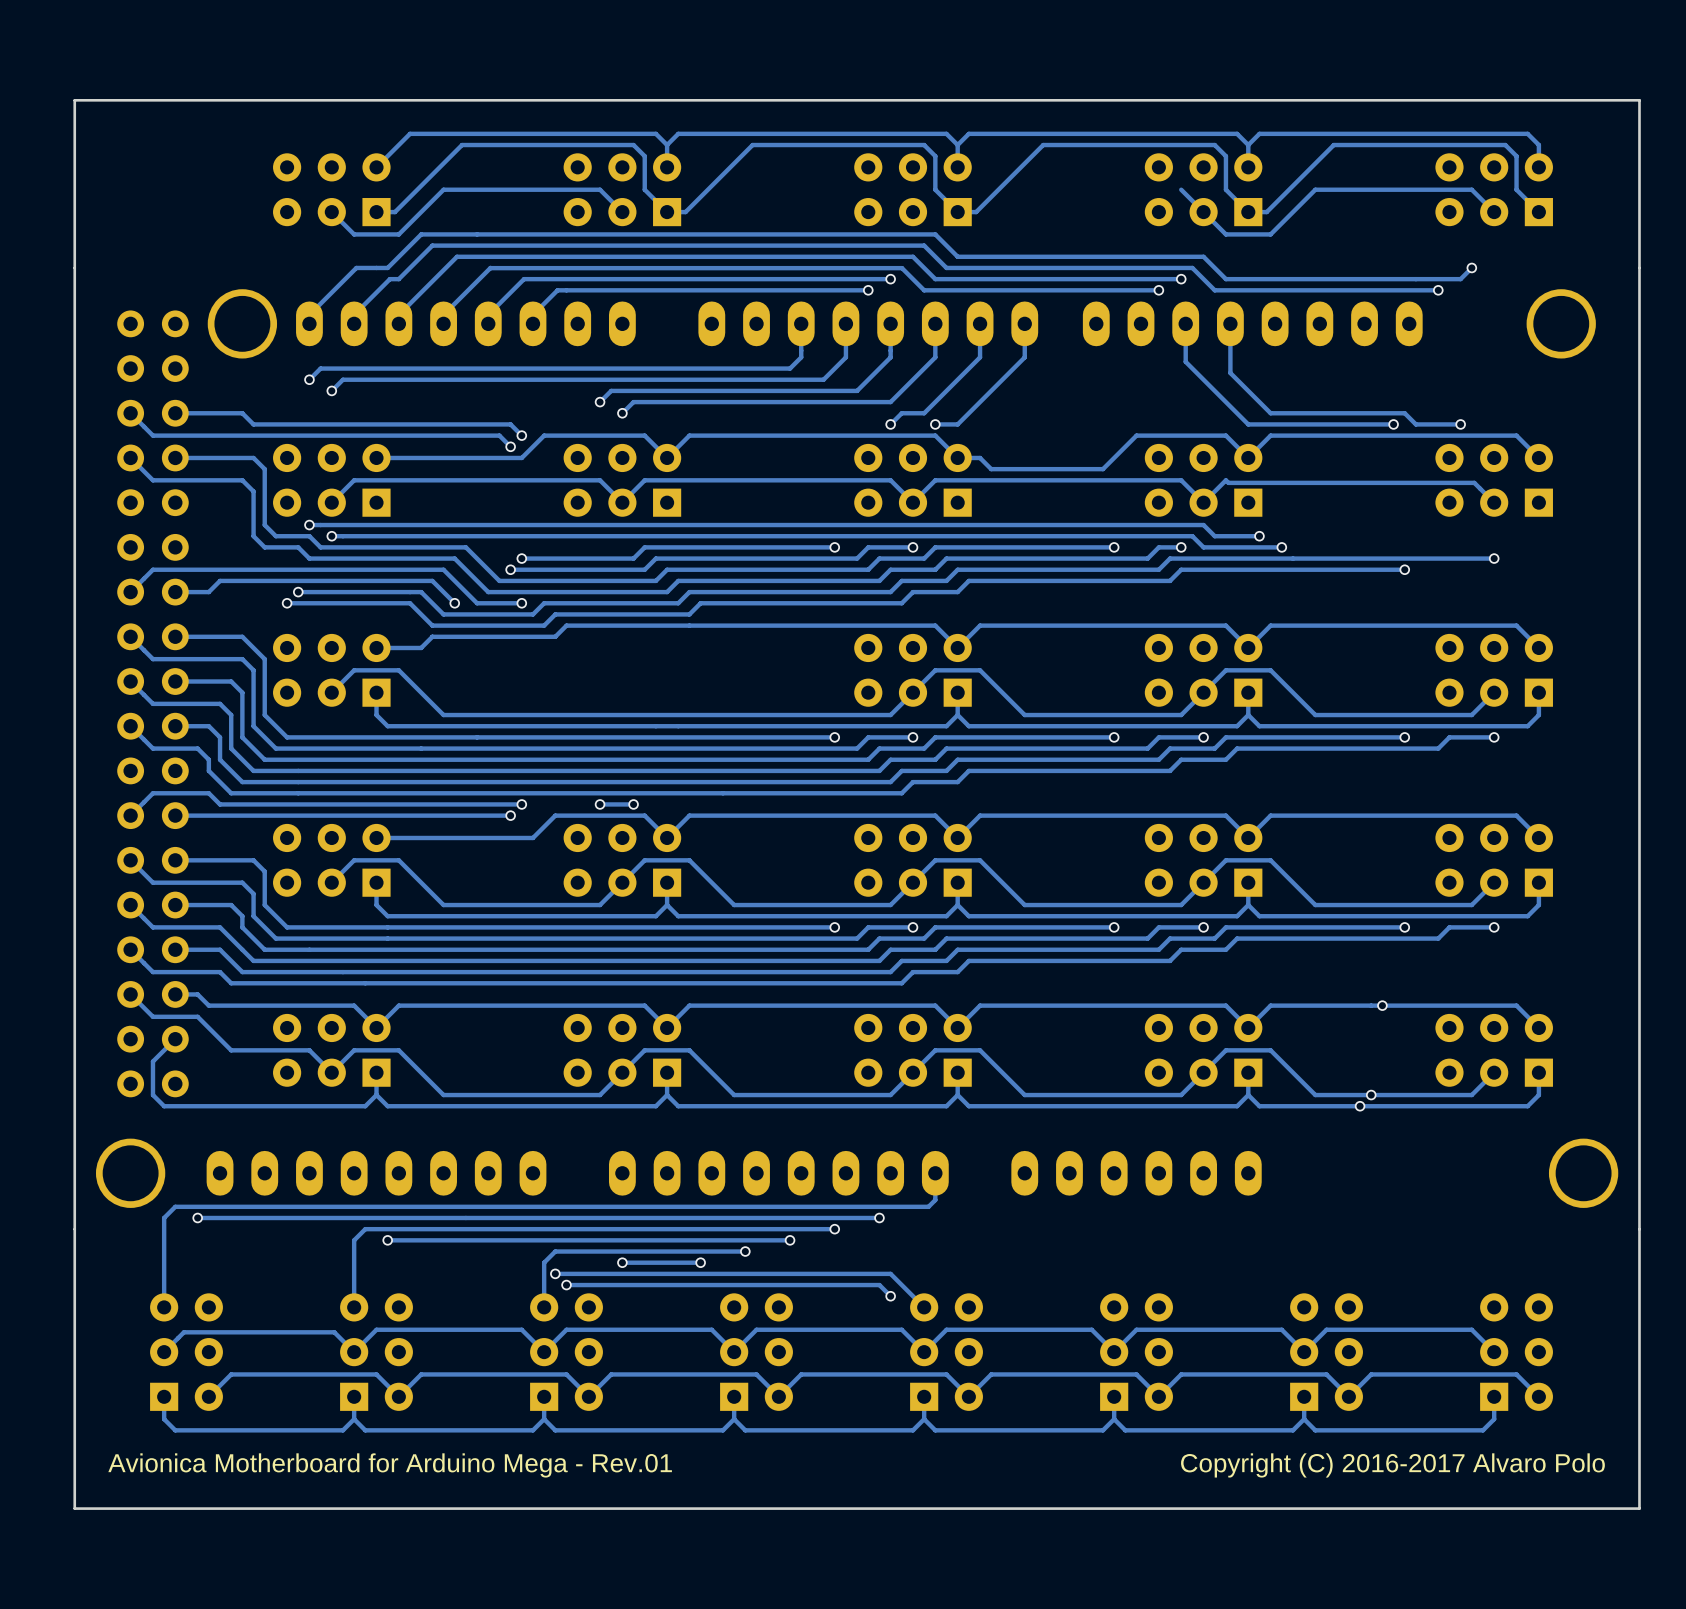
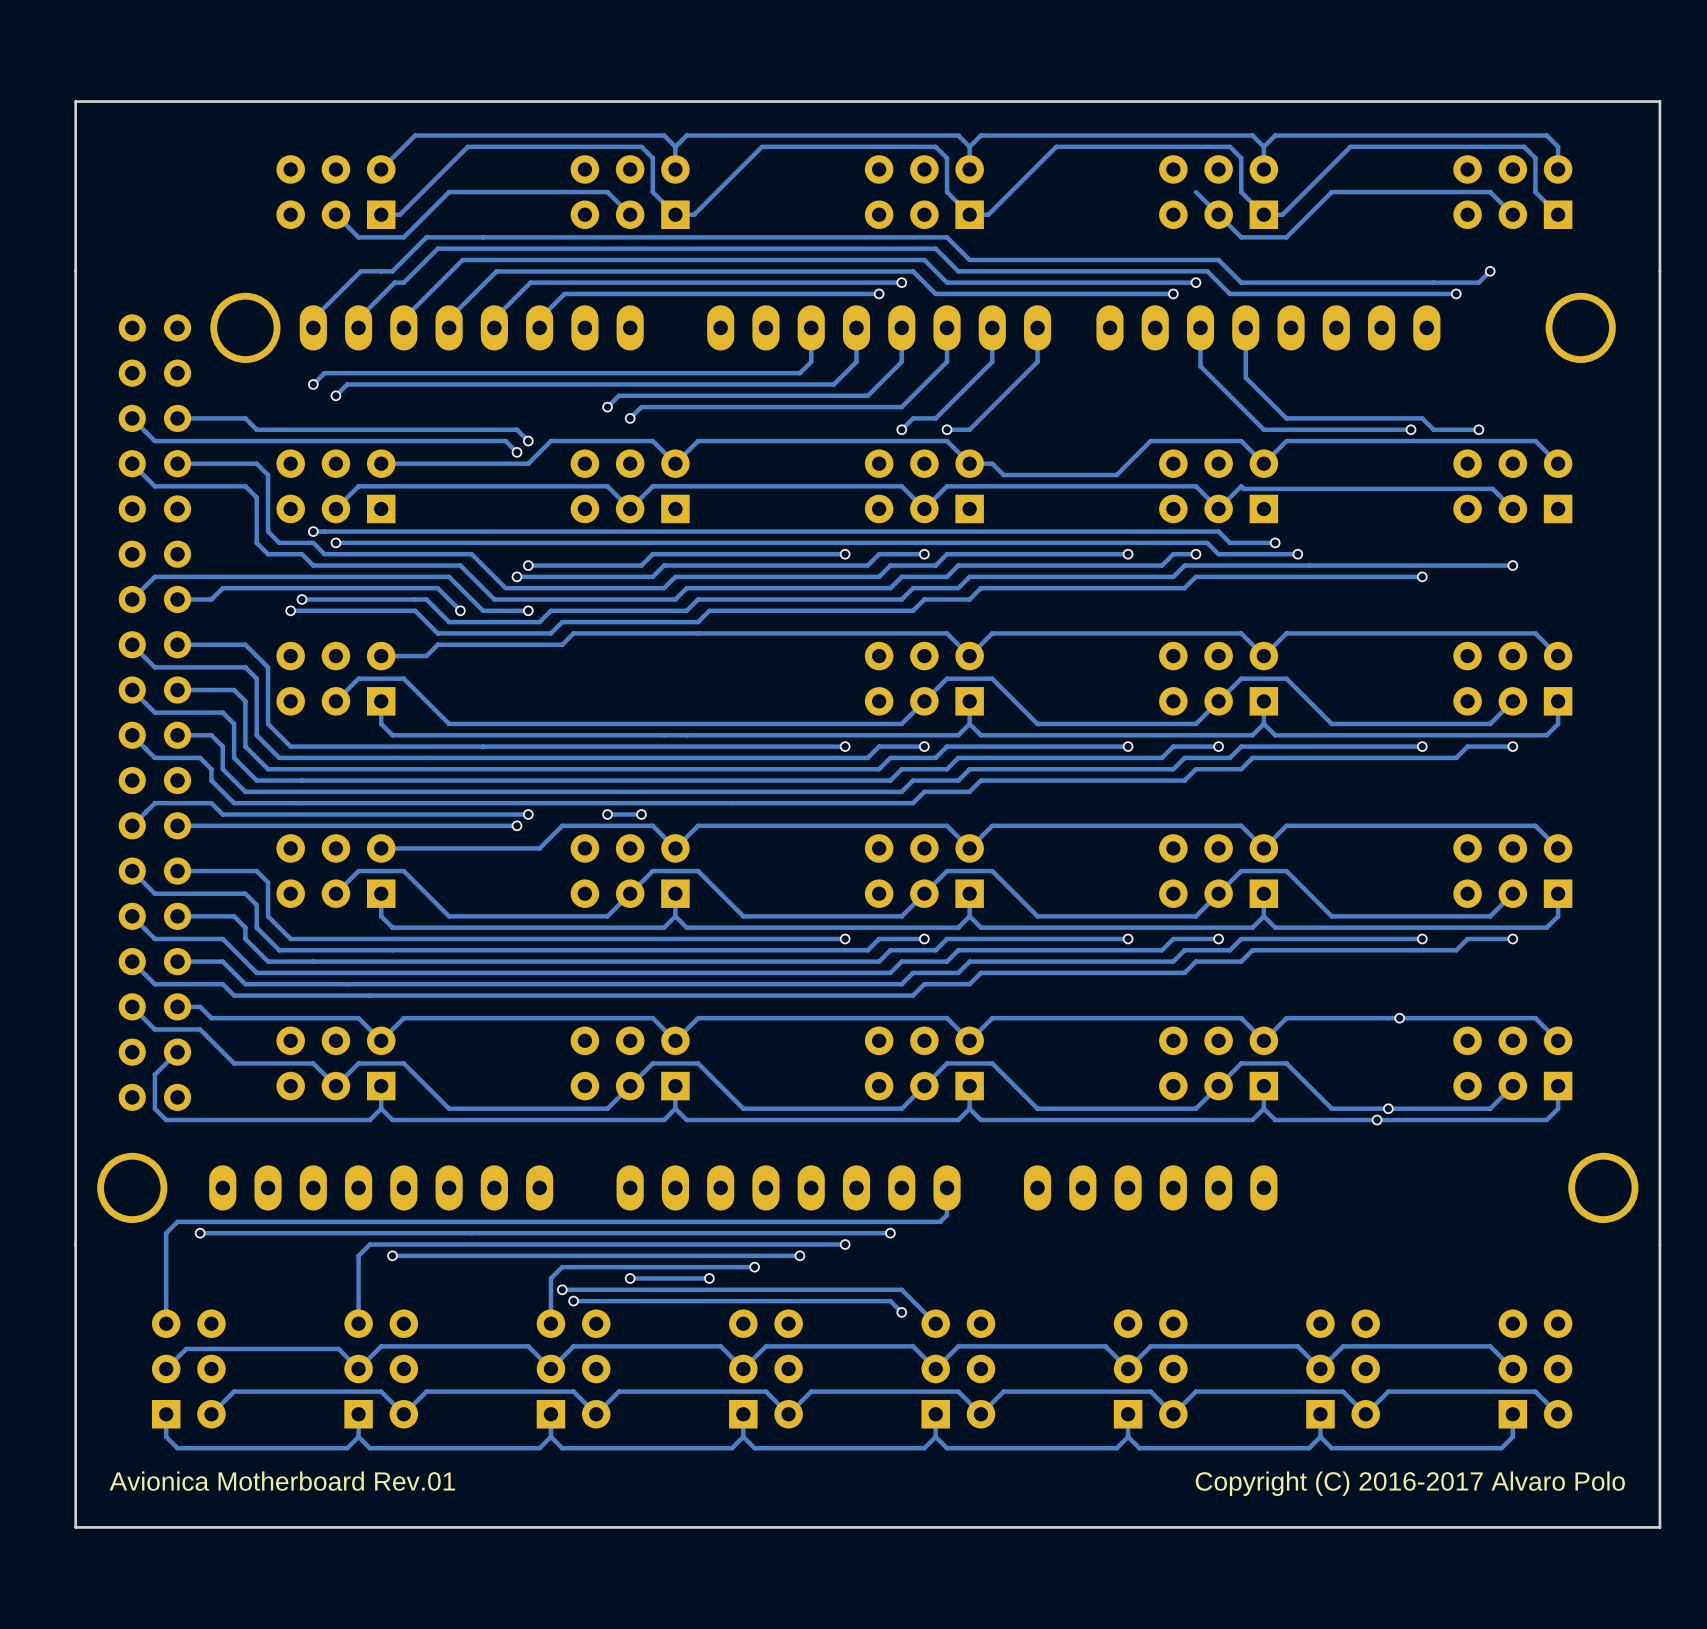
text: Avionica Motherboard for Arduino Mega - Rev.01 (390, 1465) -> Avionica Motherboard Rev.01 (282, 1481)

